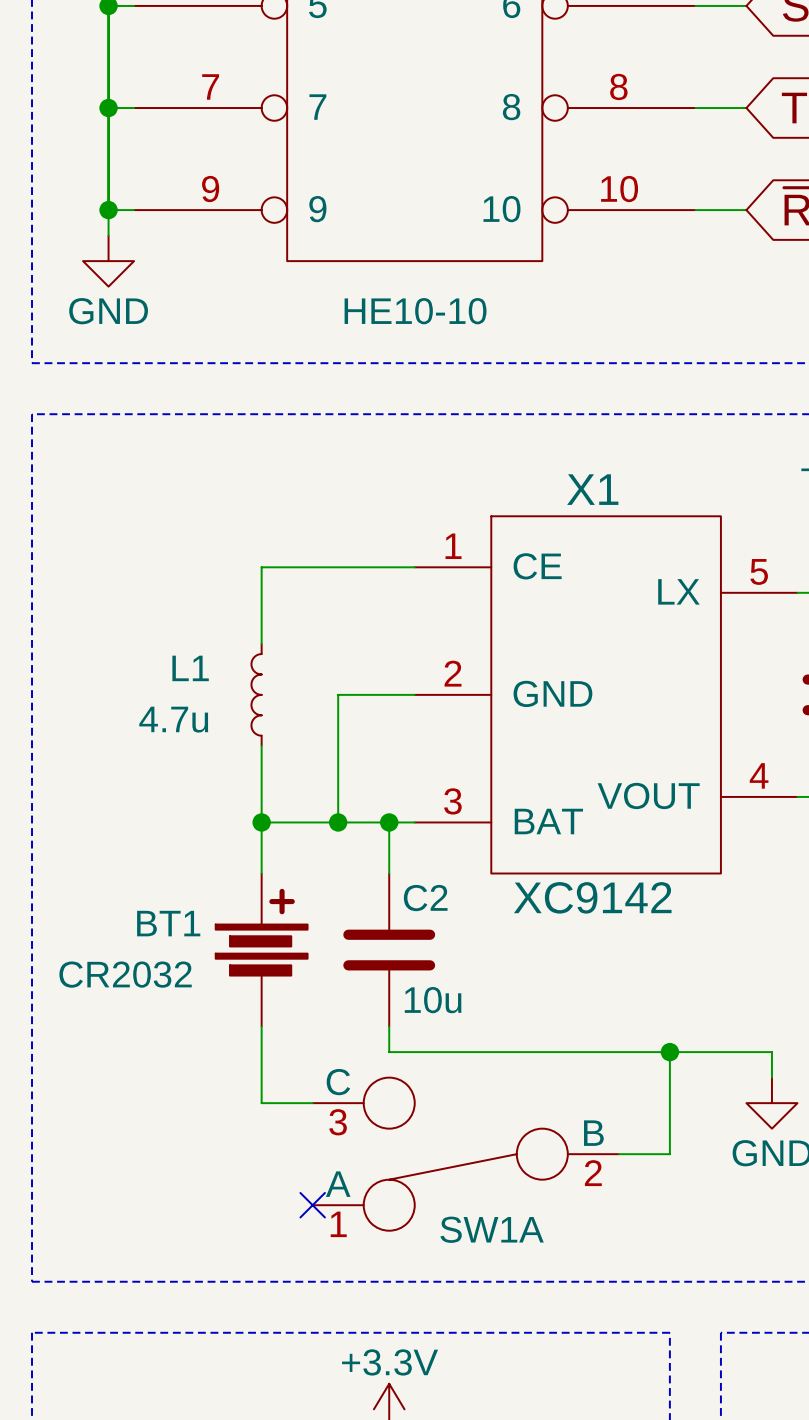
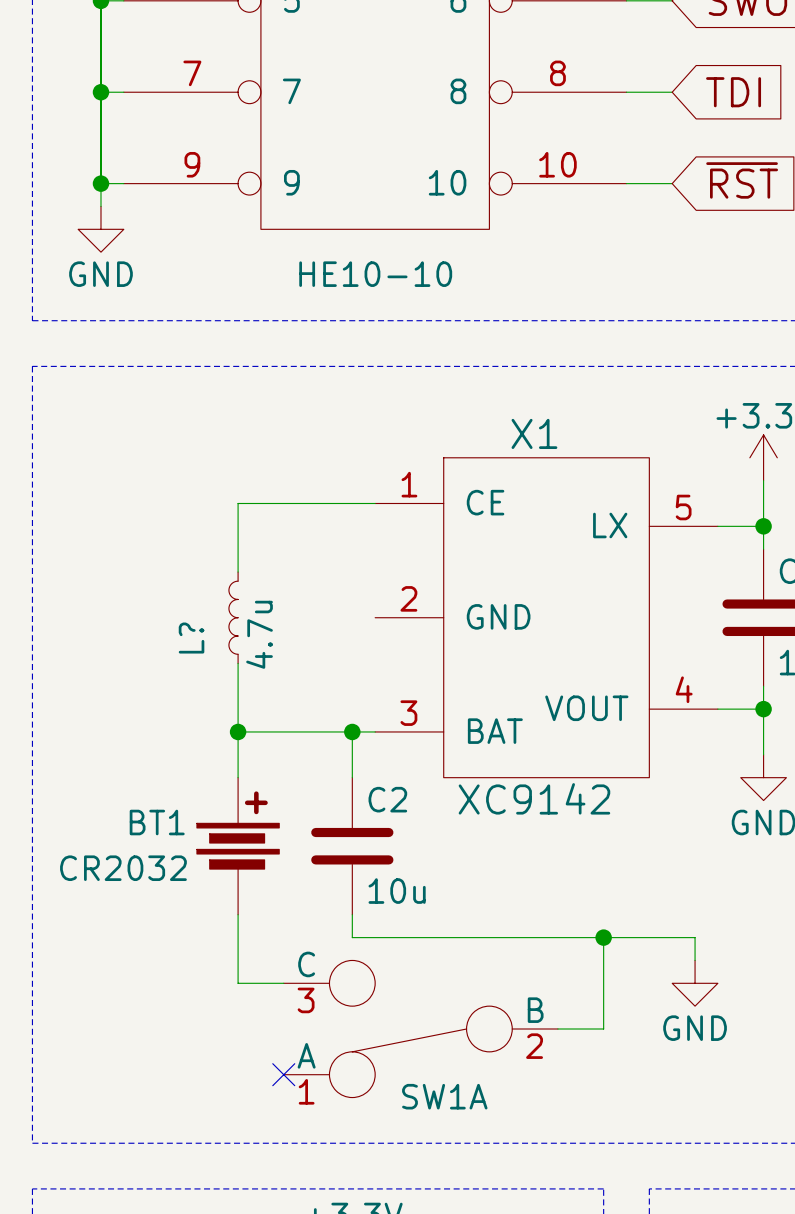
L1 name: L1 (190, 668) -> L? (191, 638)
wire: (414, 694) (338, 694) (338, 822) -> none
L1 value rotation: 0° (173, 719) -> 90° counterclockwise (259, 634)
L1 value position: 4.7u (173, 719) -> 4.7u (259, 634)
junction: (338, 822) -> none

